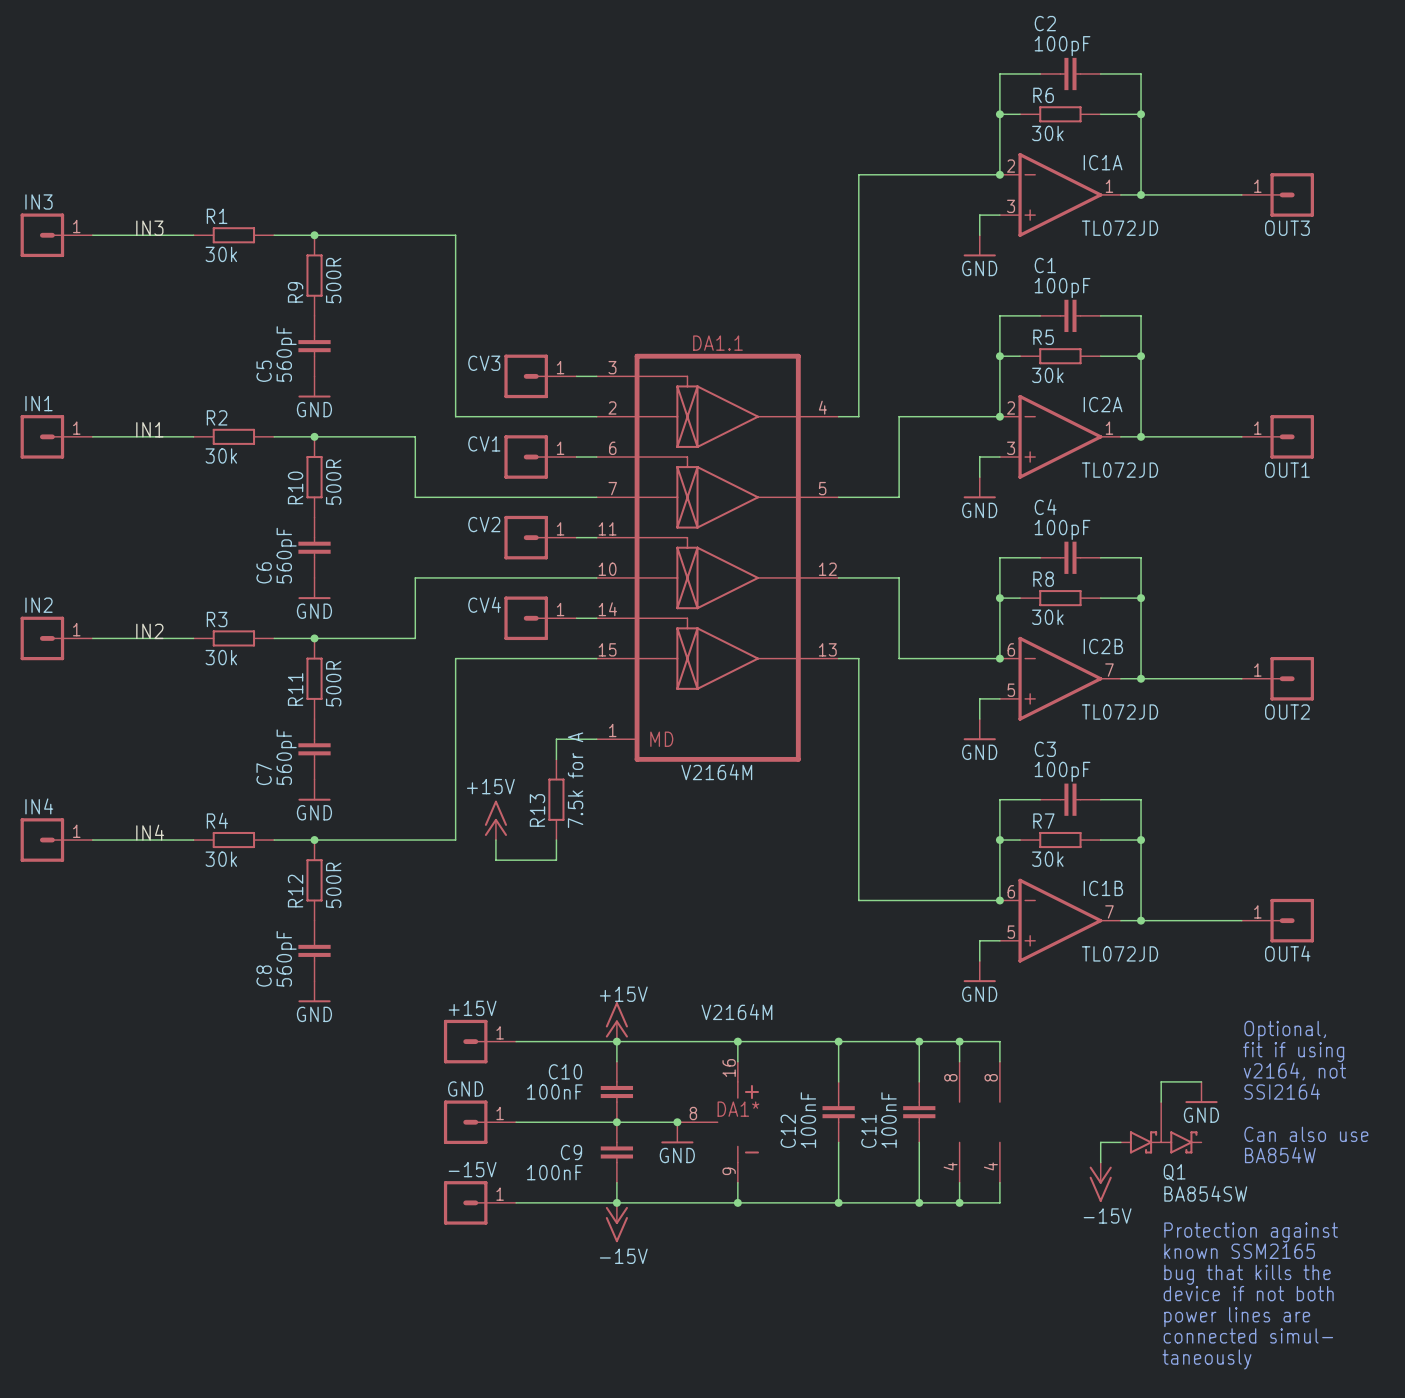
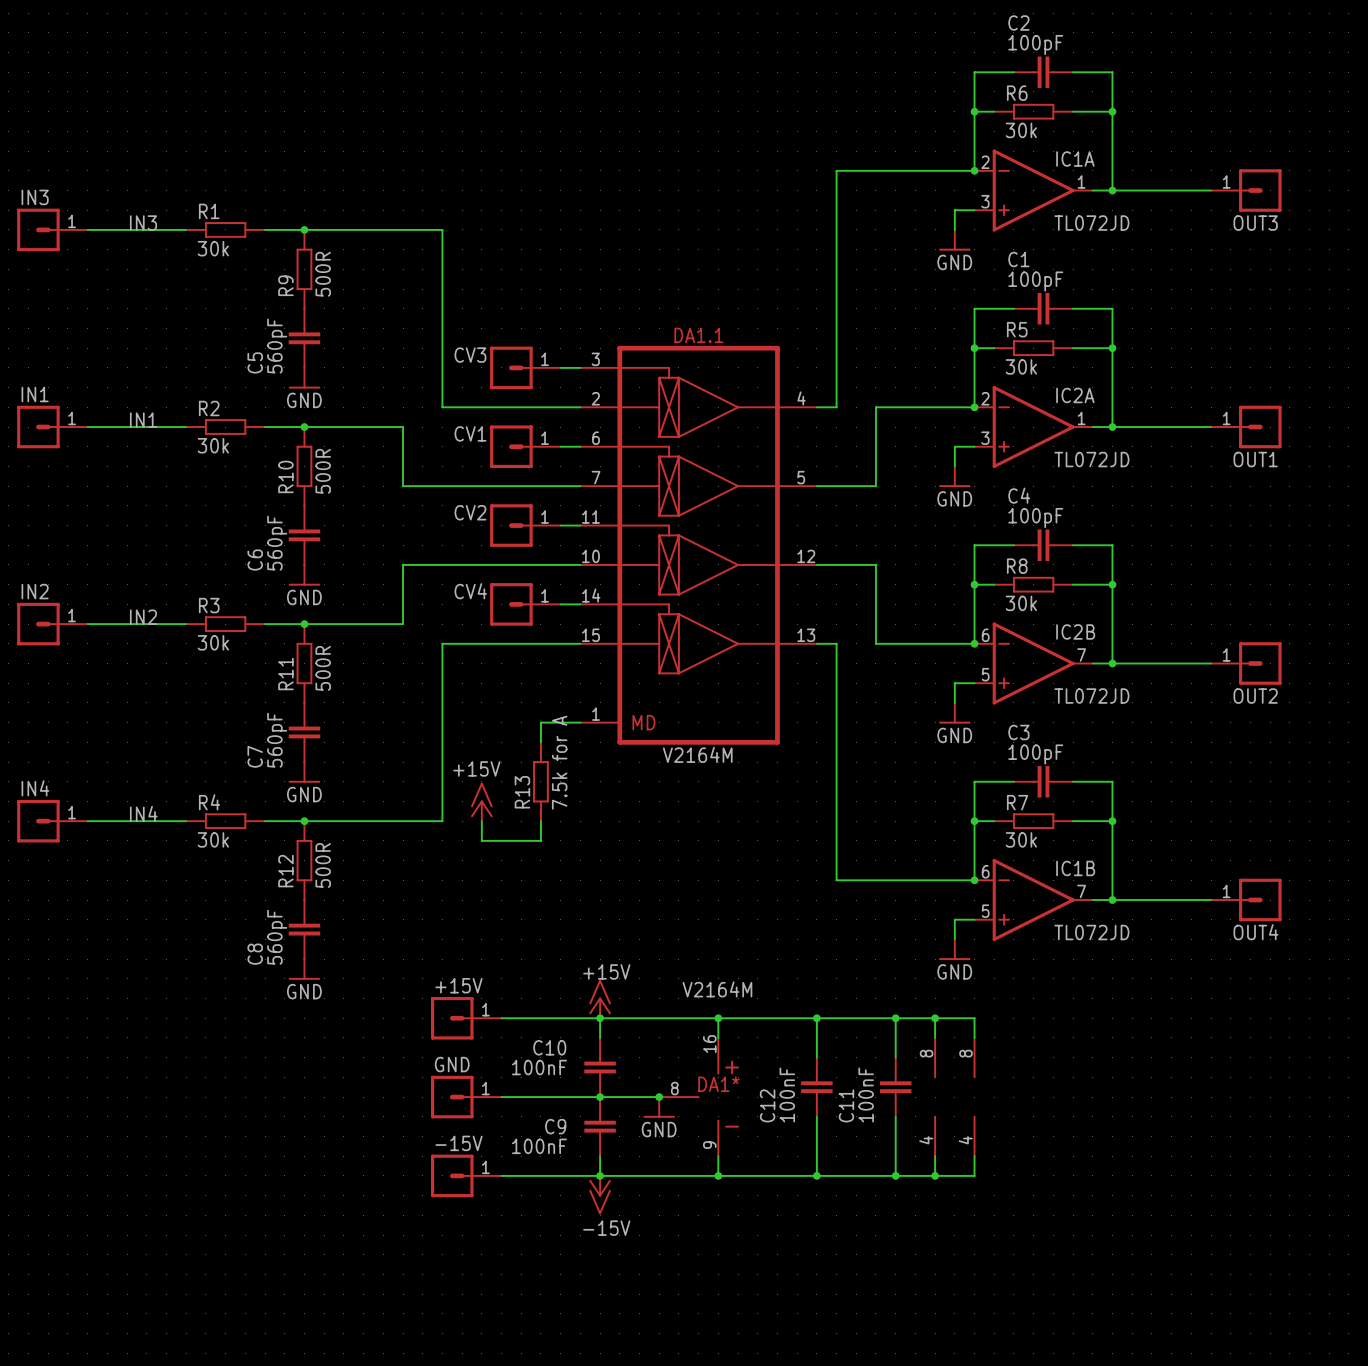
text: Optional, (1285, 1030) -> none
text: fit if using (1293, 1052) -> none
text: v2164, not (1294, 1071) -> none
wire: (1201, 1081) (1161, 1081) (1161, 1102) -> none
text: SSI2164 (1282, 1091) -> none
power symbol: GND (1201, 1092) -> none
Q1: BA854SW (1161, 1127) -> none
text: Can also use (1306, 1134) -> none
wire: (1120, 1142) (1100, 1142) (1100, 1162) -> none
text: BA854W (1280, 1155) -> none
power symbol: -15V (1100, 1182) -> none
text: Protection against (1251, 1232) -> none
text: known SSM2165 (1239, 1251) -> none
text: bug that kills the (1247, 1274) -> none
text: device if not both (1248, 1293) -> none
text: power lines are (1237, 1317) -> none
text: connected simul- (1248, 1335) -> none
text: taneously (1206, 1359) -> none

